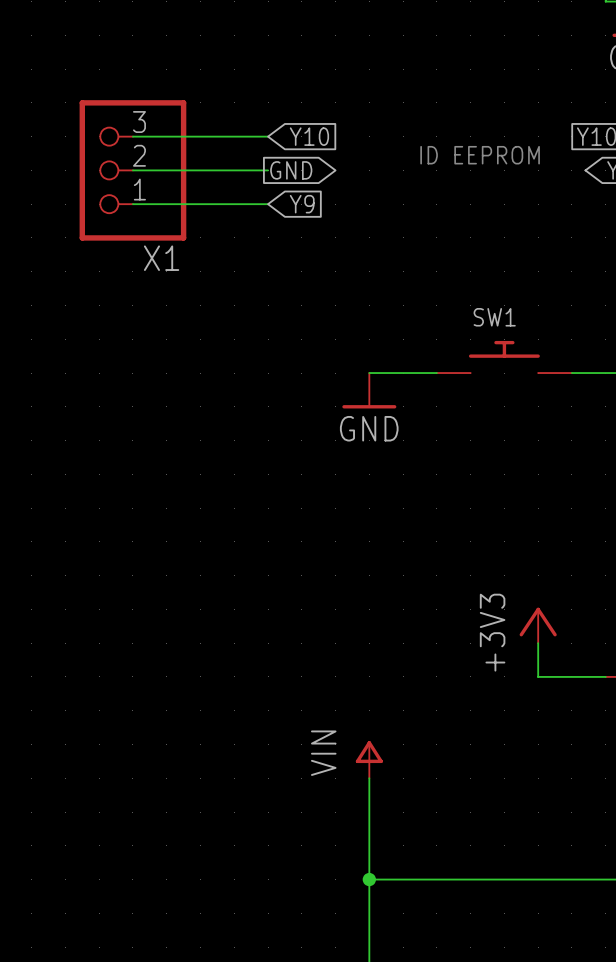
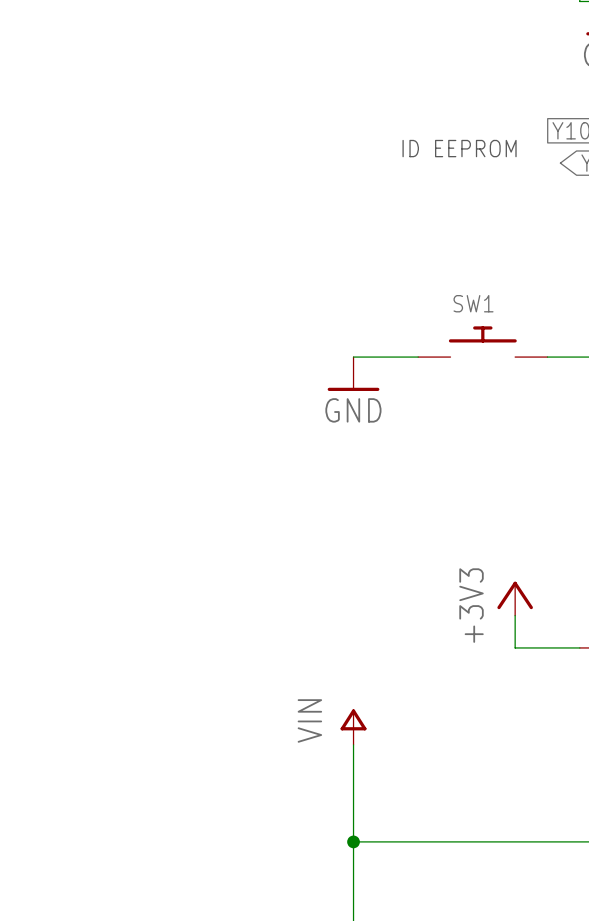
wire: (132, 136) (268, 136) -> none
global label: Y10 (309, 136) -> none
wire: (132, 170) (268, 170) -> none
X1: (132, 170) -> none
global label: GND (291, 170) -> none
wire: (132, 204) (268, 204) -> none
global label: Y9 (302, 204) -> none

